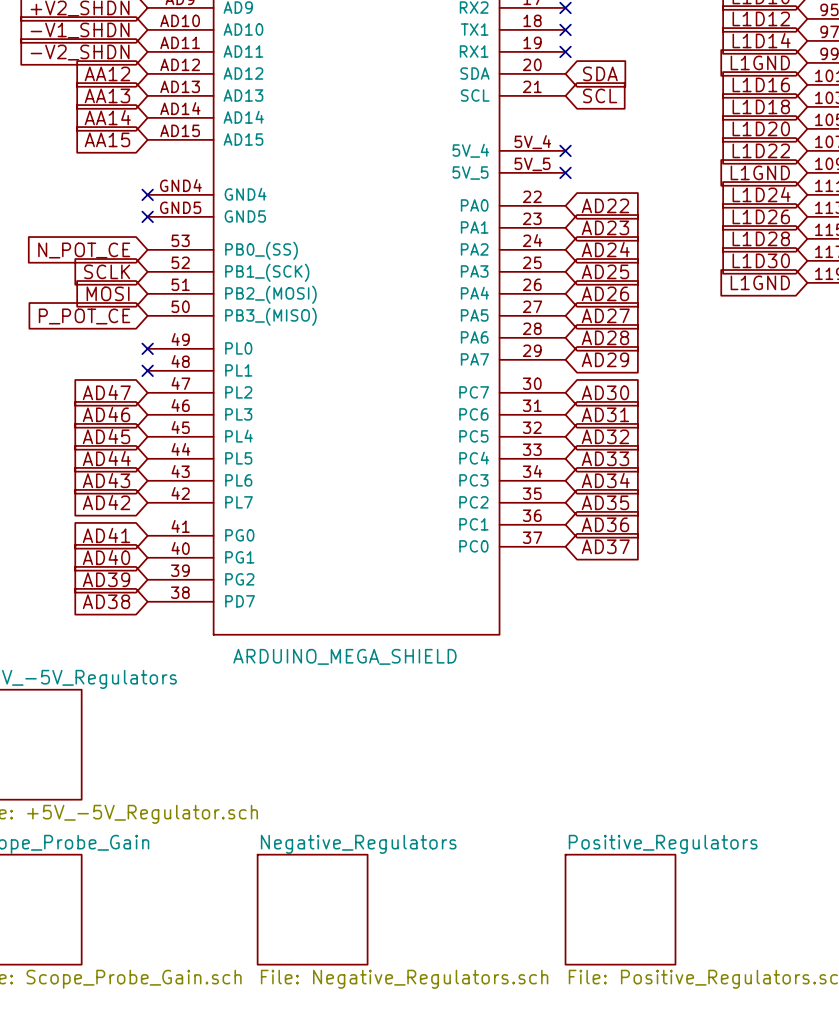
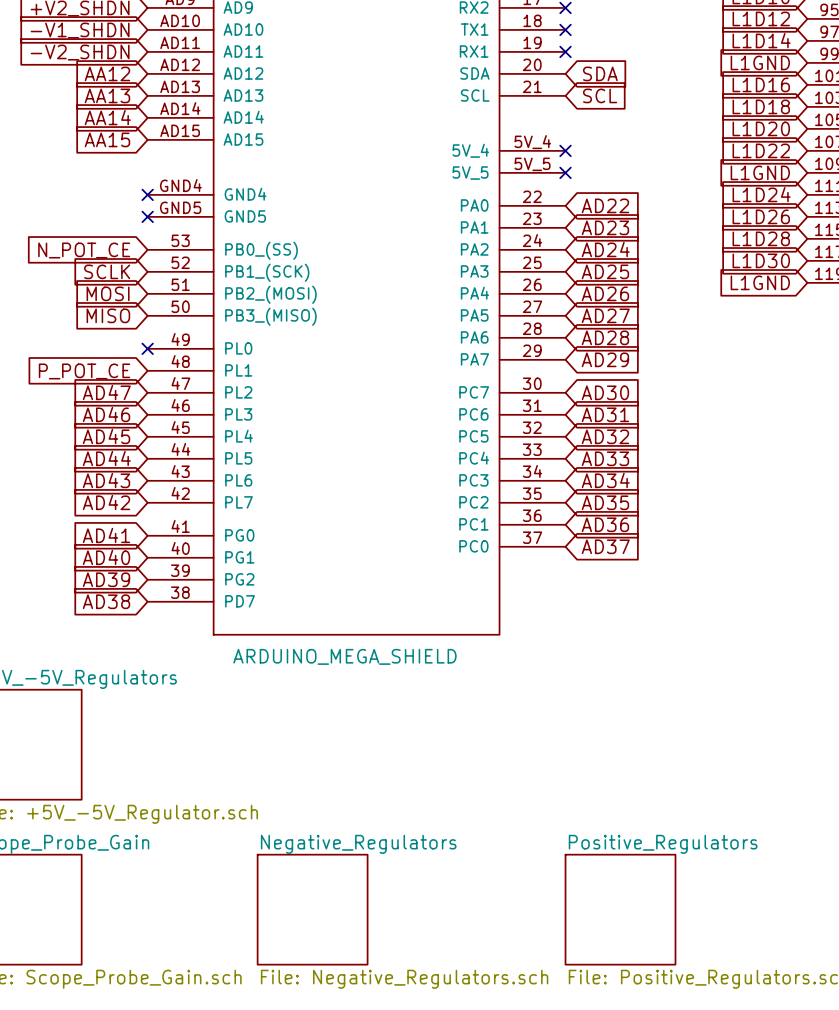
global label: P_POT_CE (84, 316) -> MISO (108, 315)
no-connect mark: (147, 370) -> none
global label: none -> P_POT_CE (84, 371)

